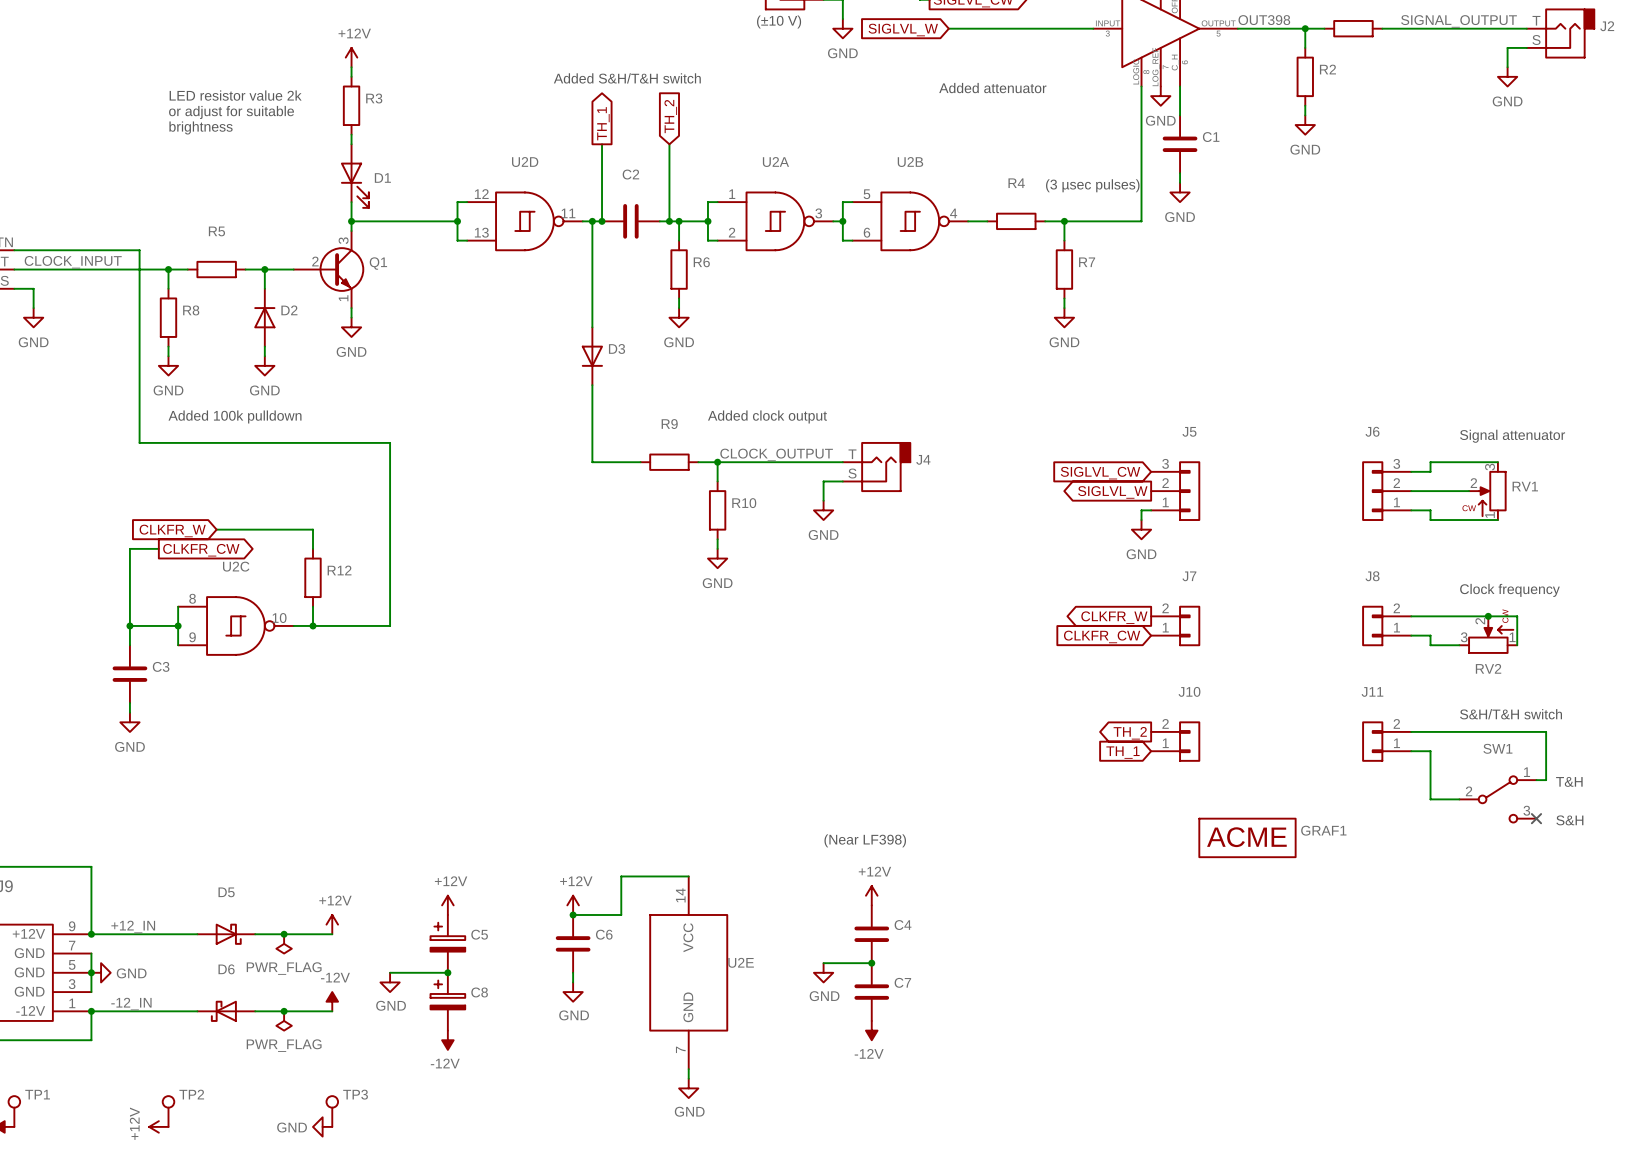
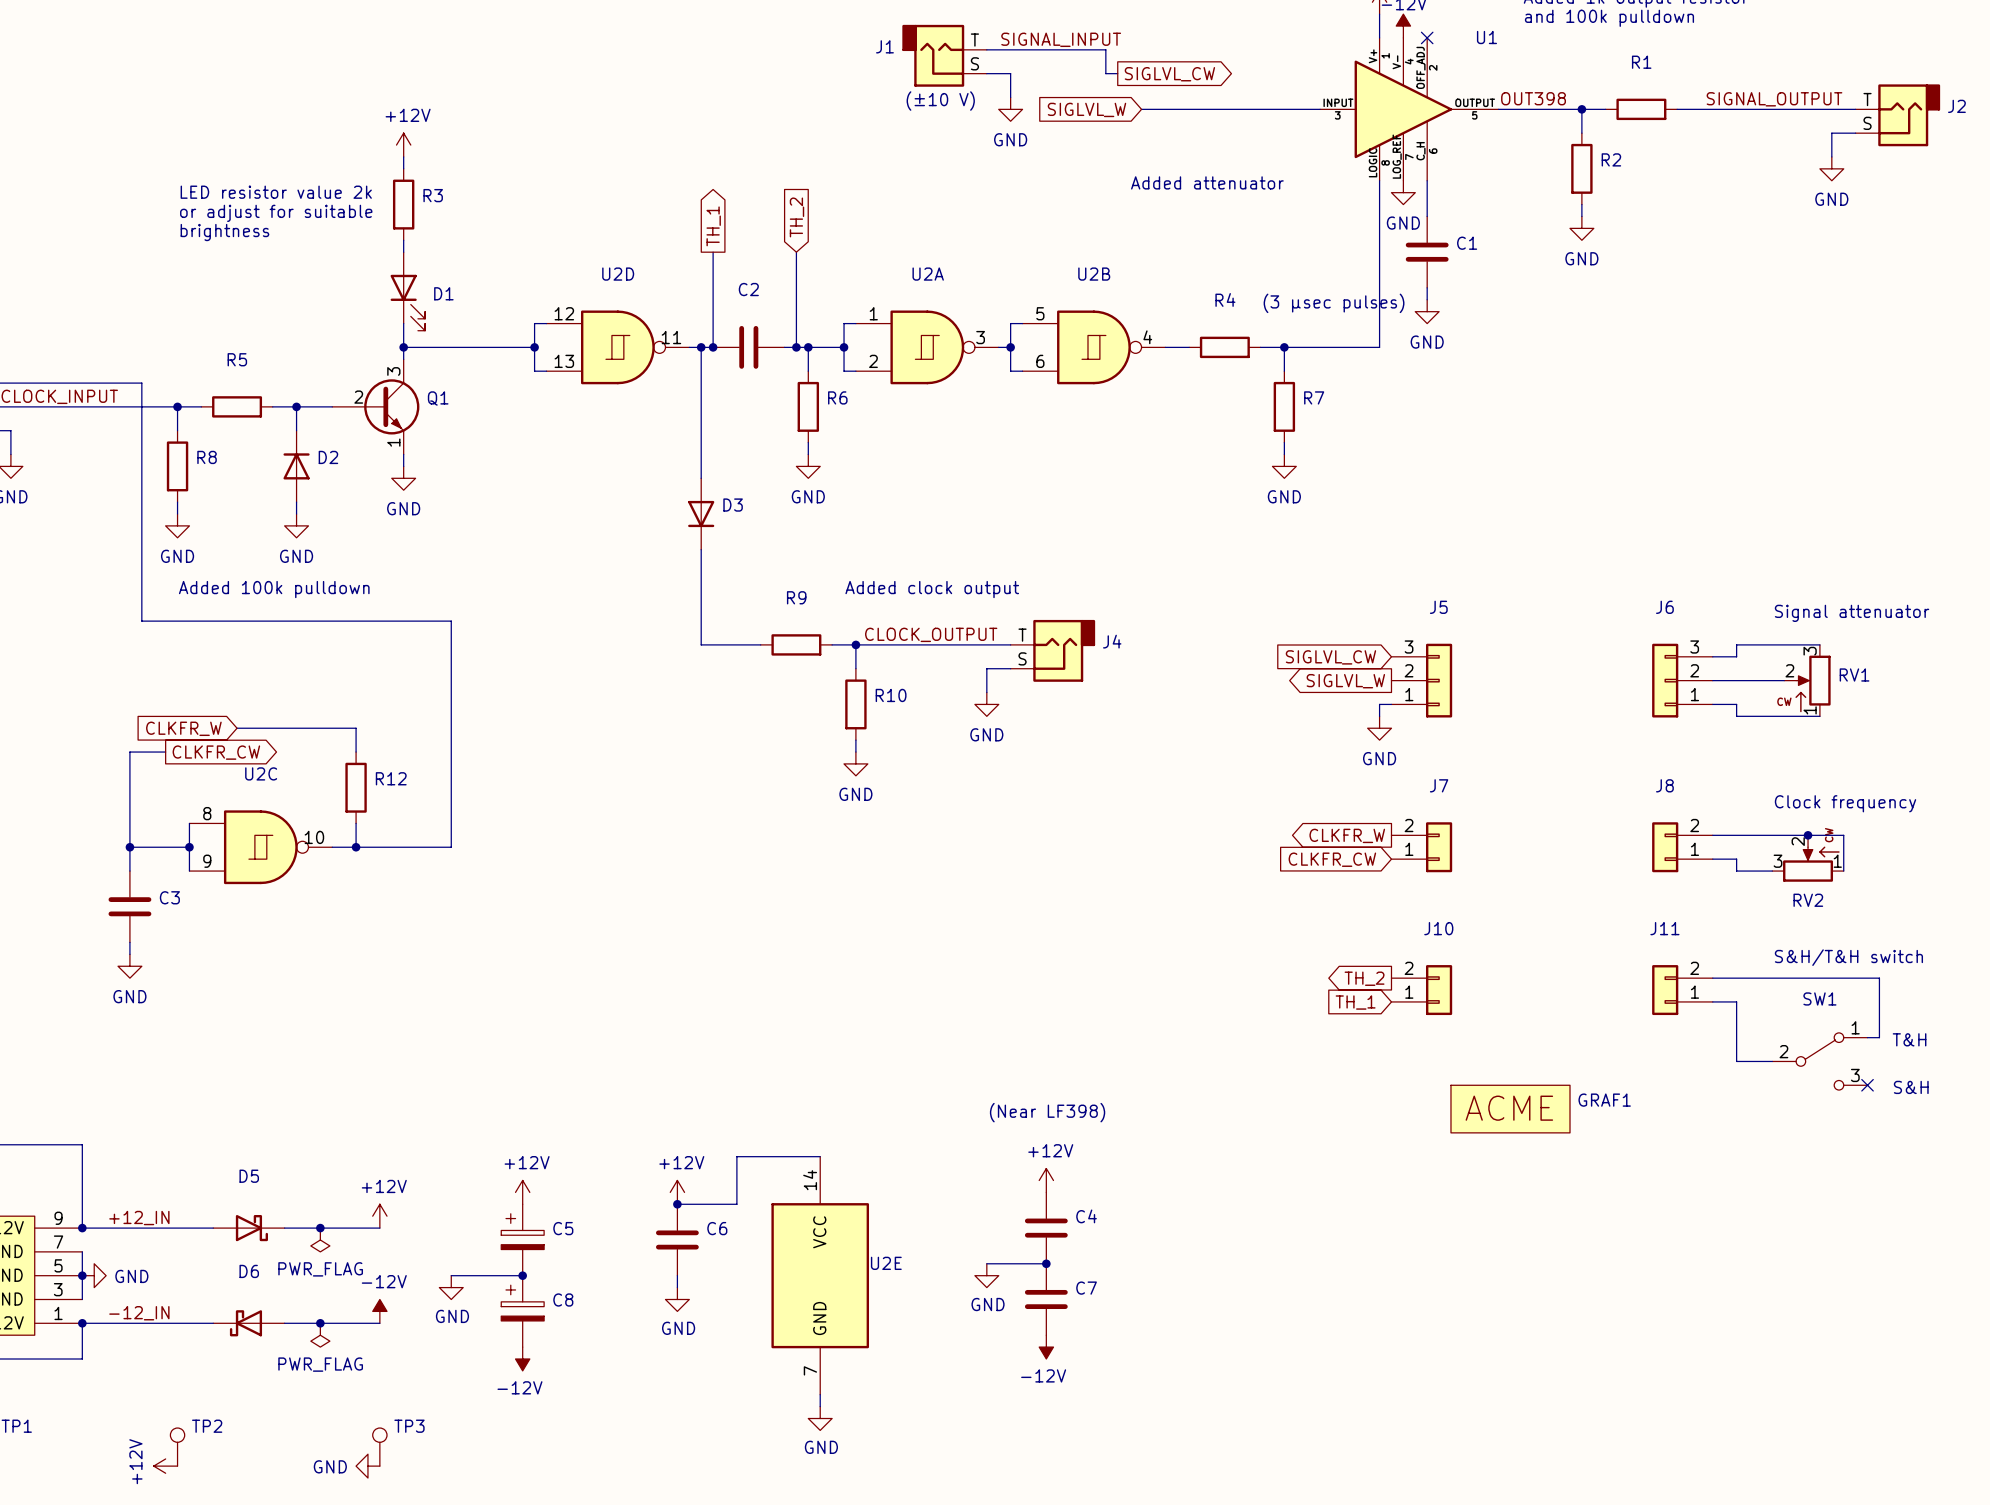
text: Added S&H/T&H switch (627, 78) -> none

